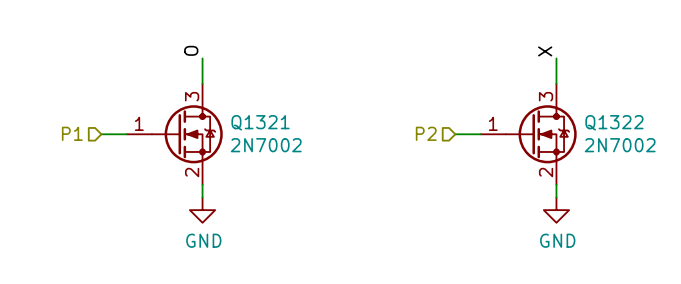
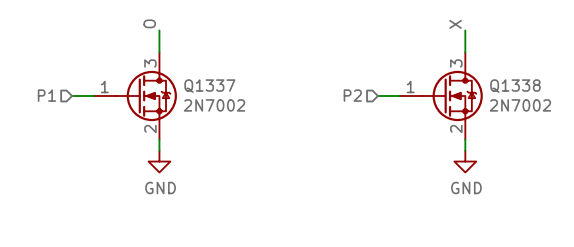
Q1321 name: Q1321 (260, 122) -> Q1337 (209, 86)
Q1322 name: Q1322 (614, 122) -> Q1338 (515, 86)

